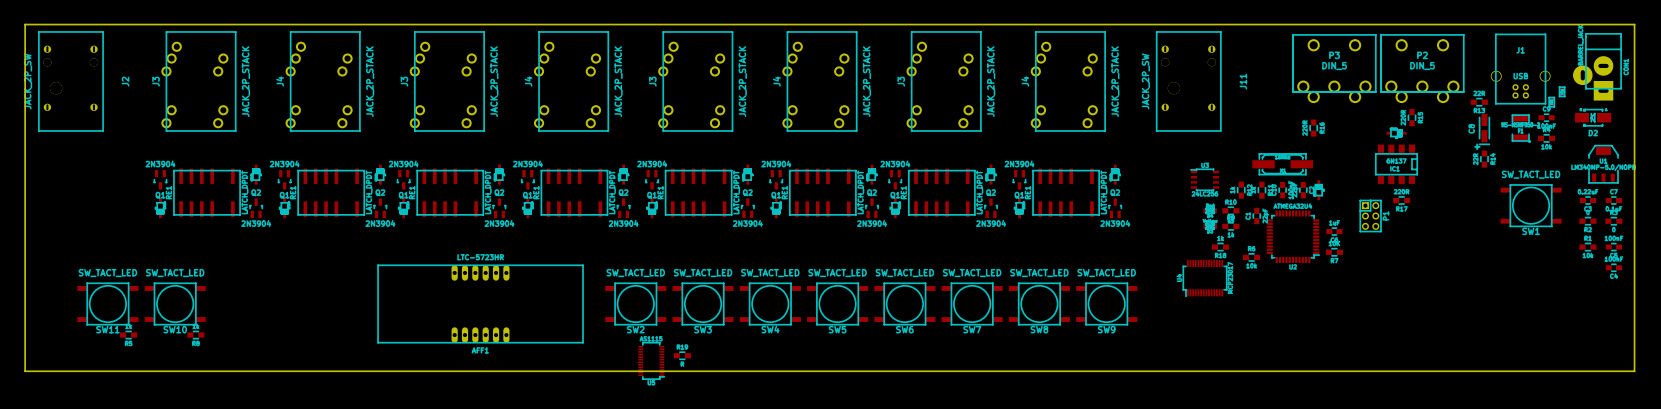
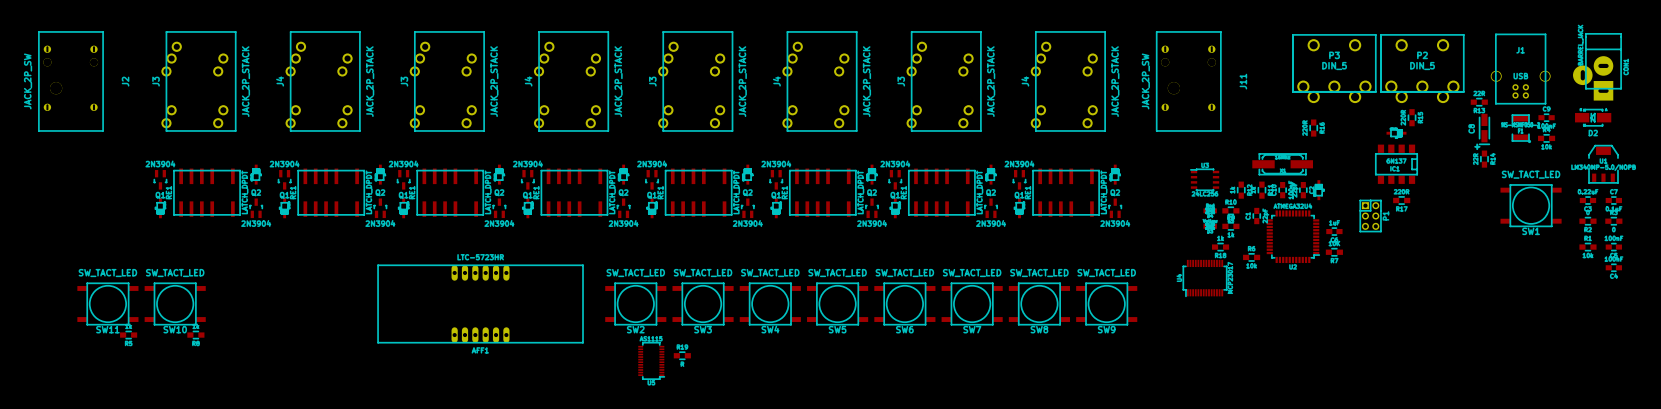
board edge: (25, 24) (25, 371) (1634, 371) (1634, 24) (25, 24) -> none
part: (1562, 91) -> none
part: (1551, 102) -> none

